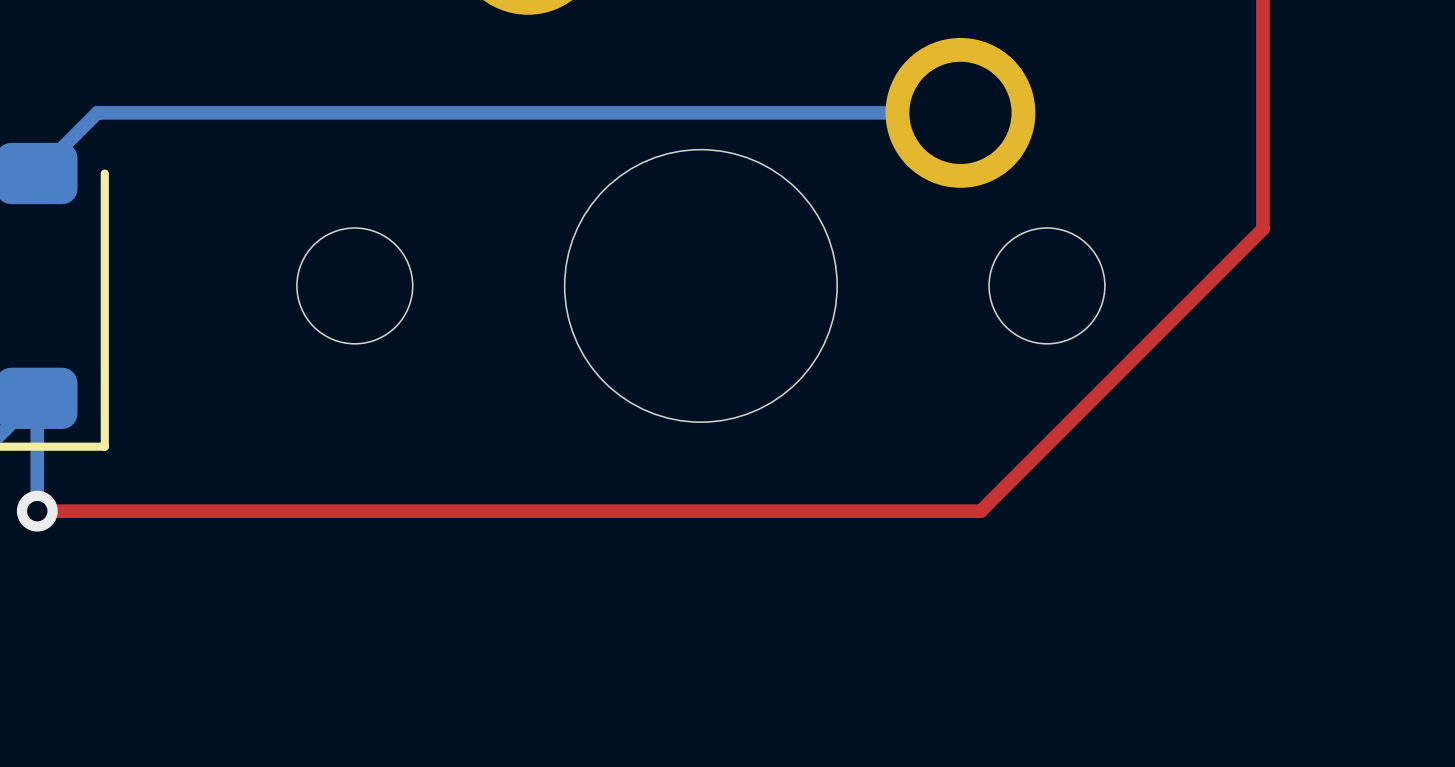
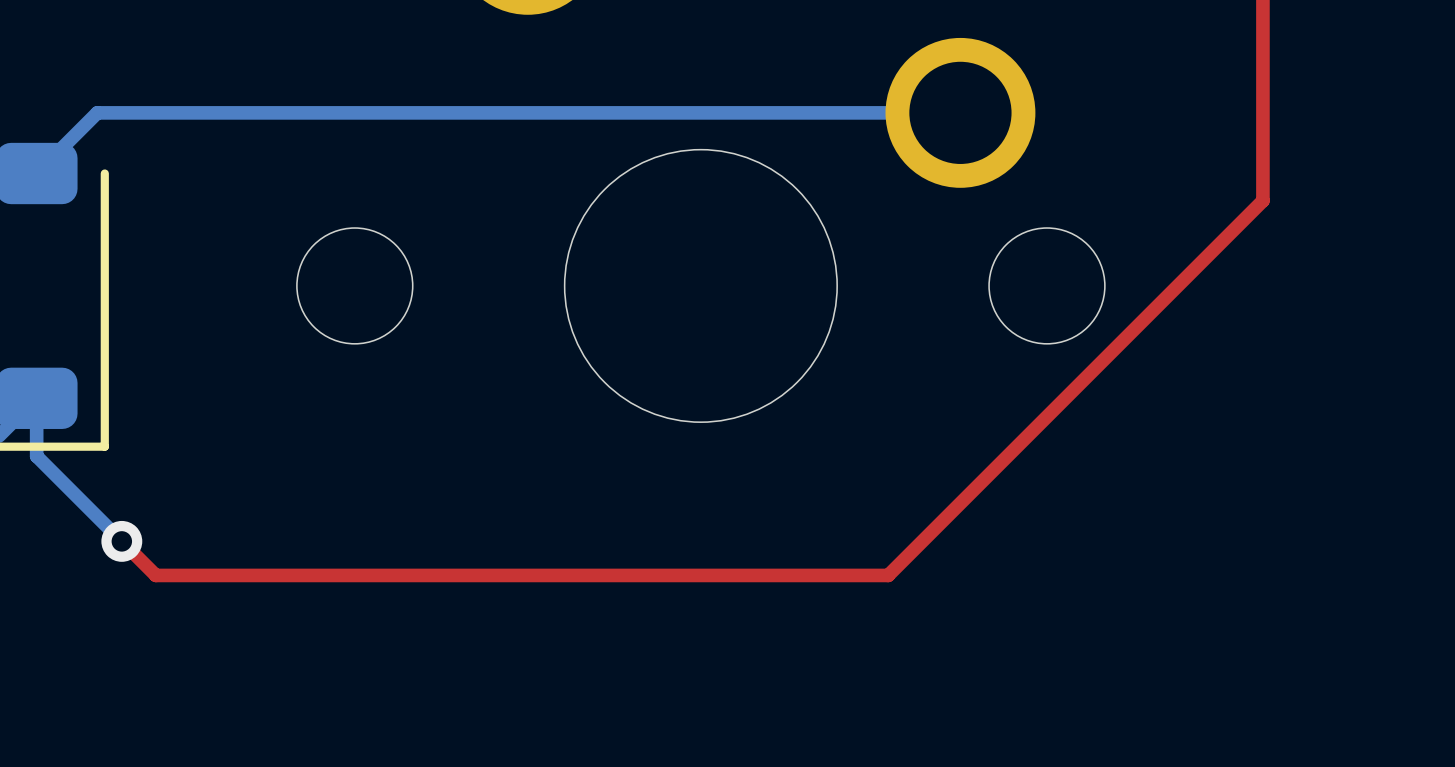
top track: (1262, 200) (1262, 229) (980, 511) (37, 511) -> (1262, 200) (888, 575) (155, 575) (121, 541)
bottom track: (37, 398) (37, 511) -> (36, 398) (36, 456) (121, 541)
via position: (37, 511) -> (121, 541)

